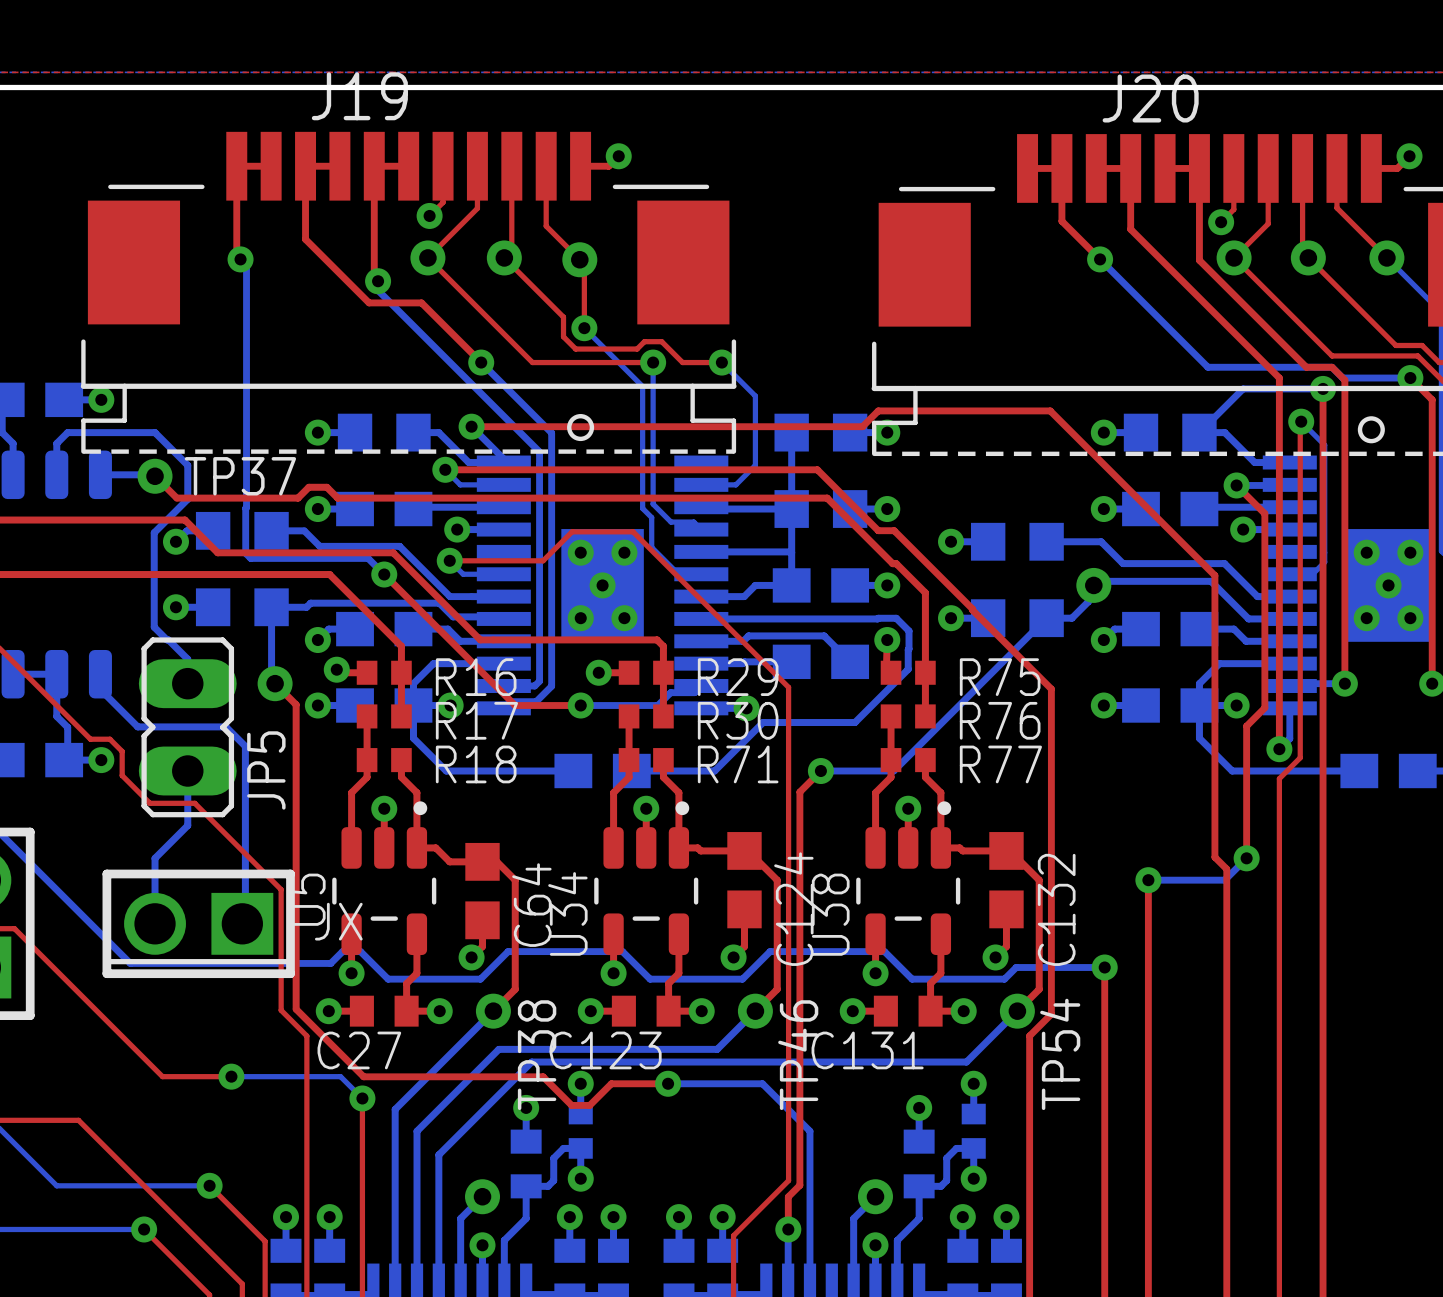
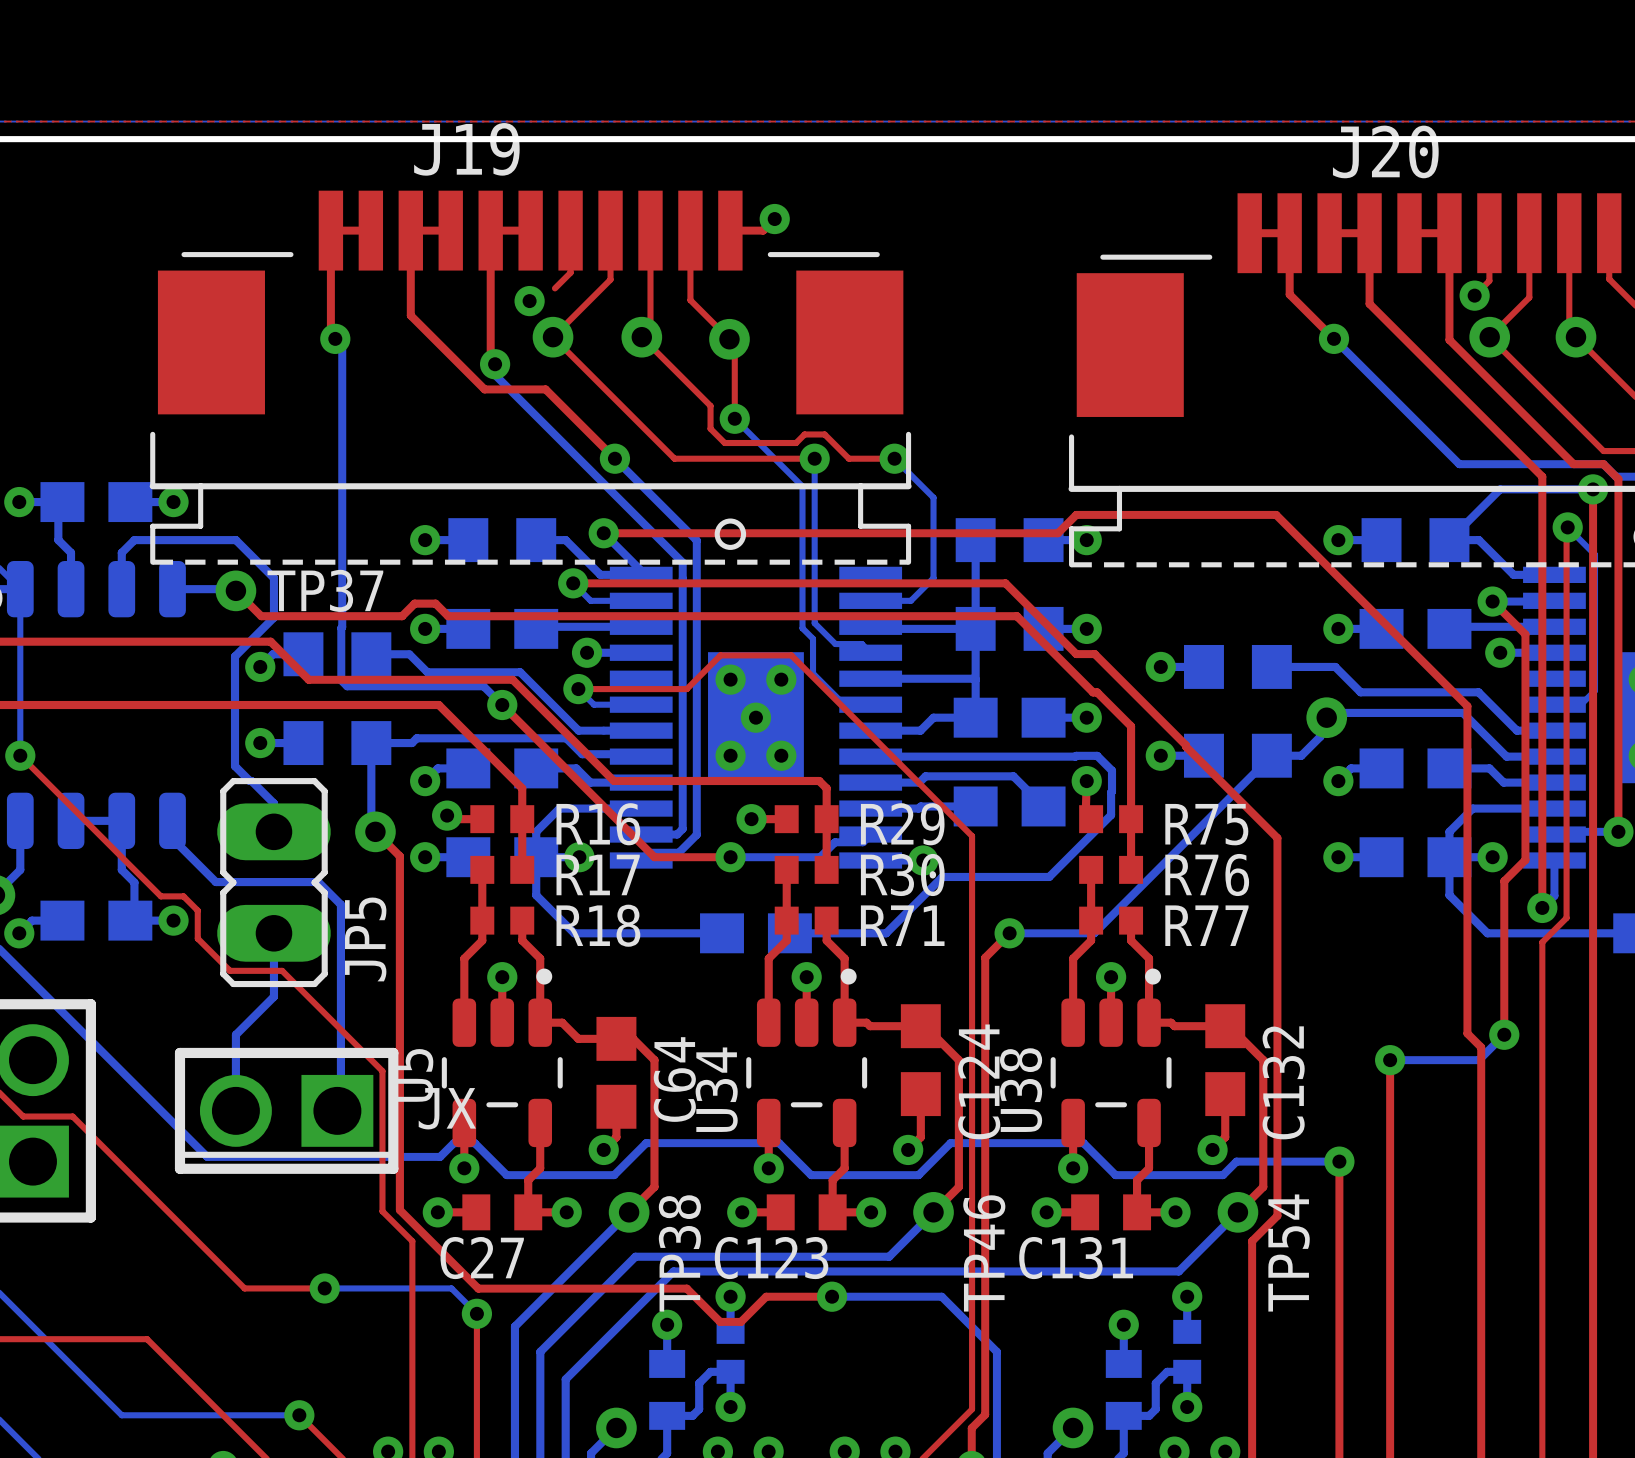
via position: (429, 215) -> (529, 301)

